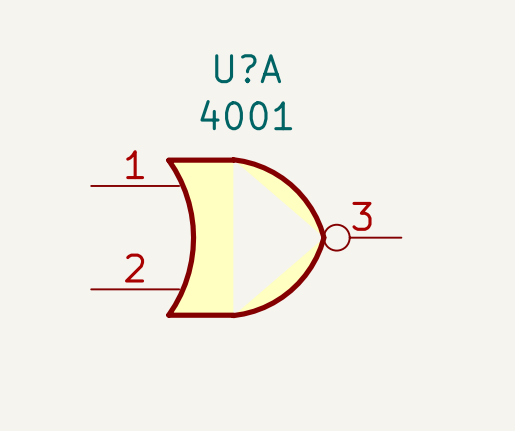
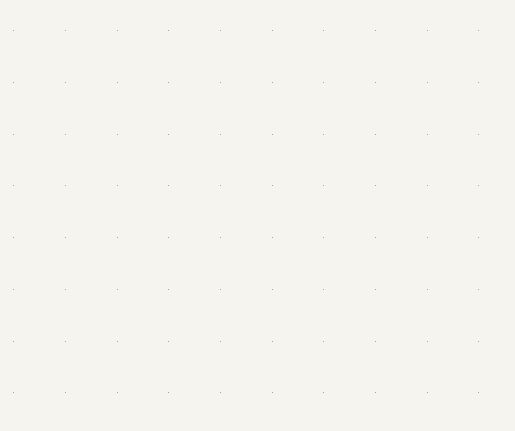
U?A: 4001 (246, 237) -> none

